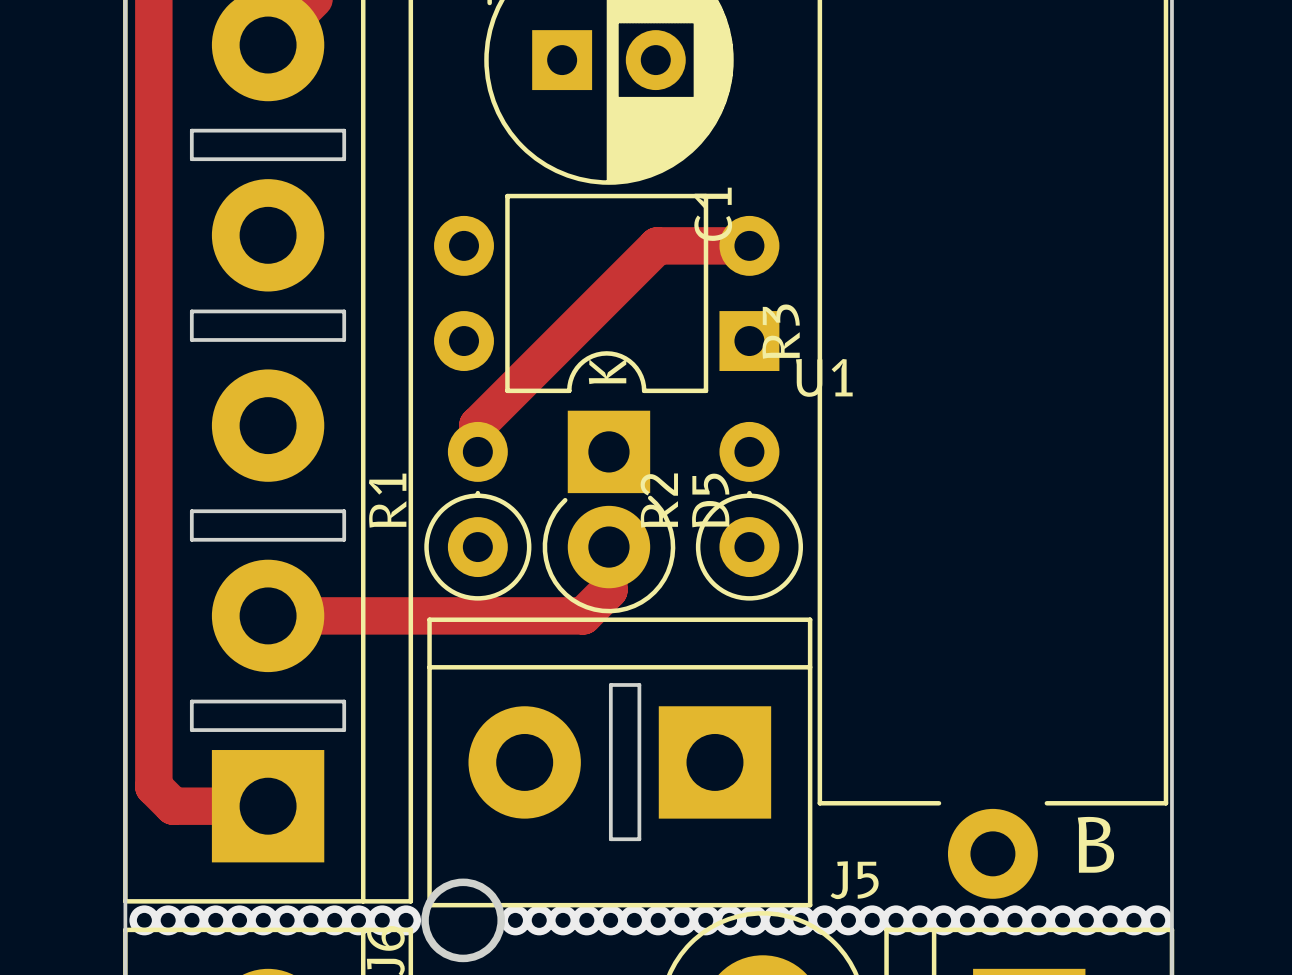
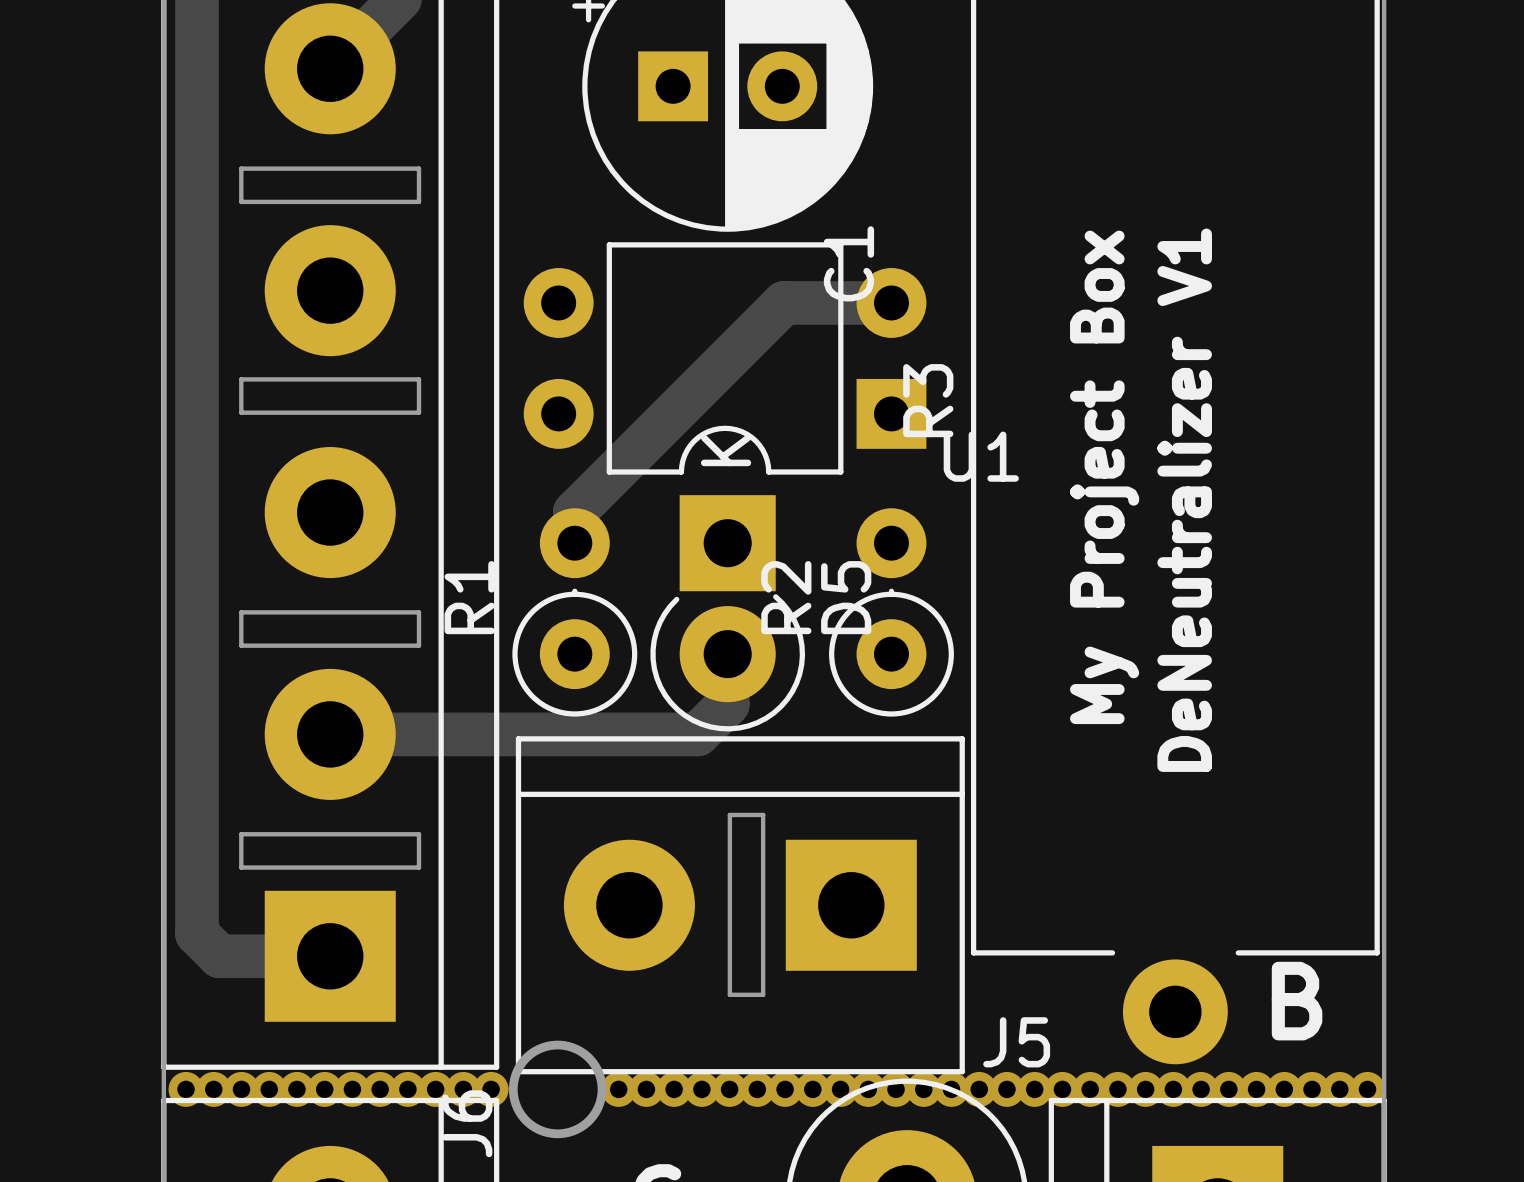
text: none -> My Project Box (1104, 477)
text: none -> DeNeutralizer V1 (1184, 500)

